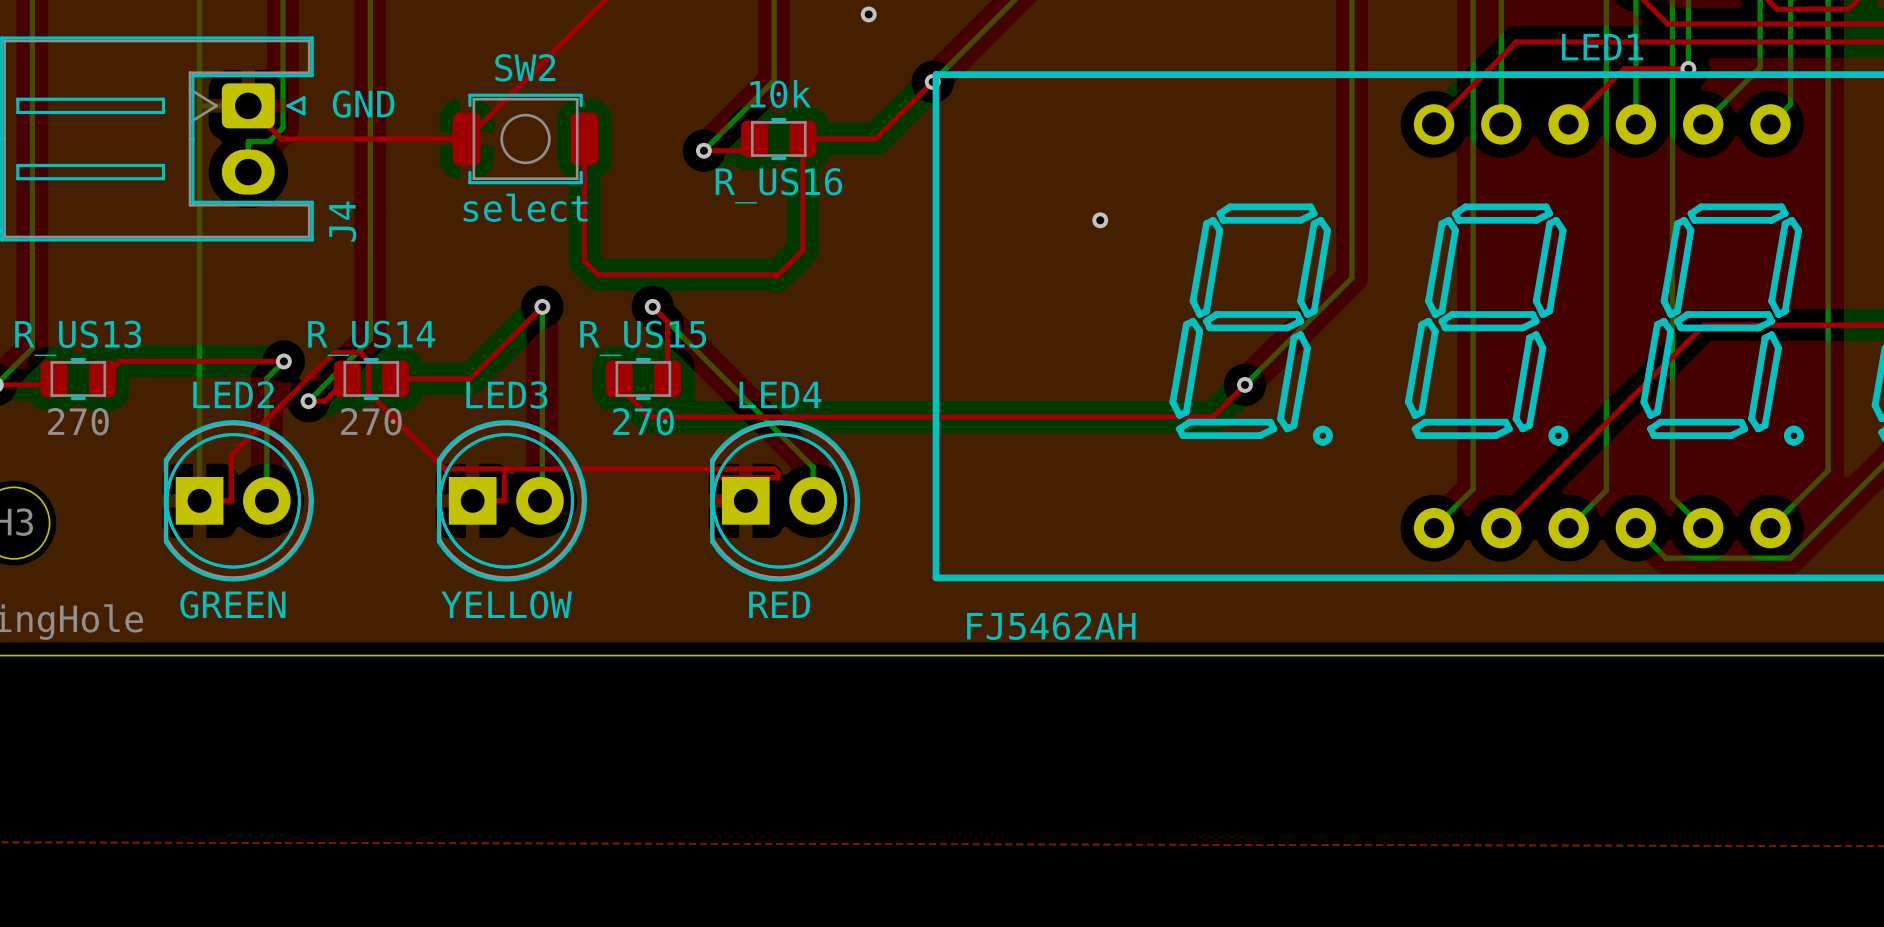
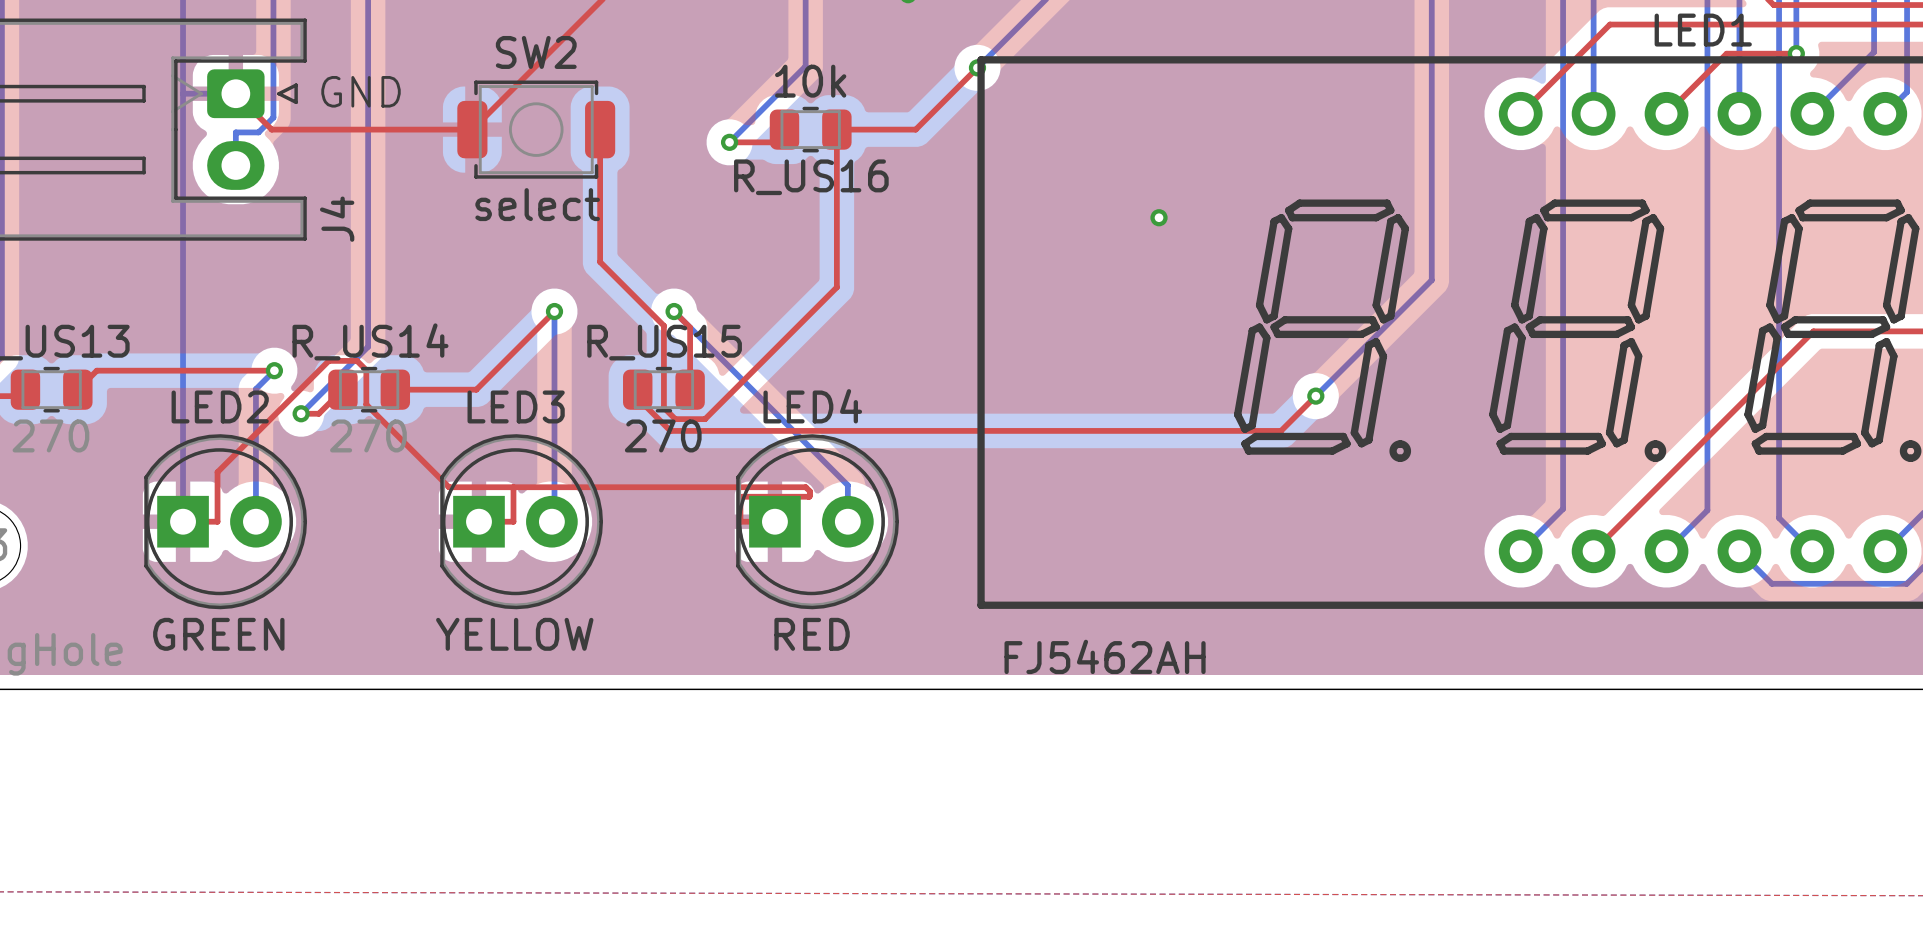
top track: (802, 250) (776, 276) (775, 274) (598, 274) -> (836, 250) (836, 287) (705, 419) (675, 419) (663, 407) (663, 325) (614, 276)

